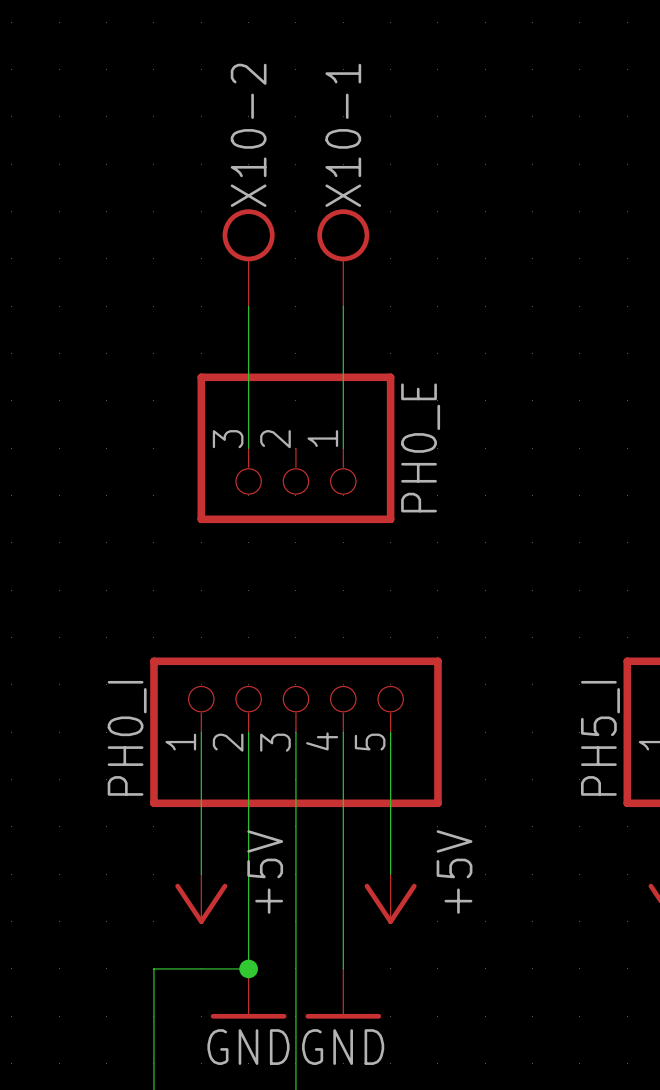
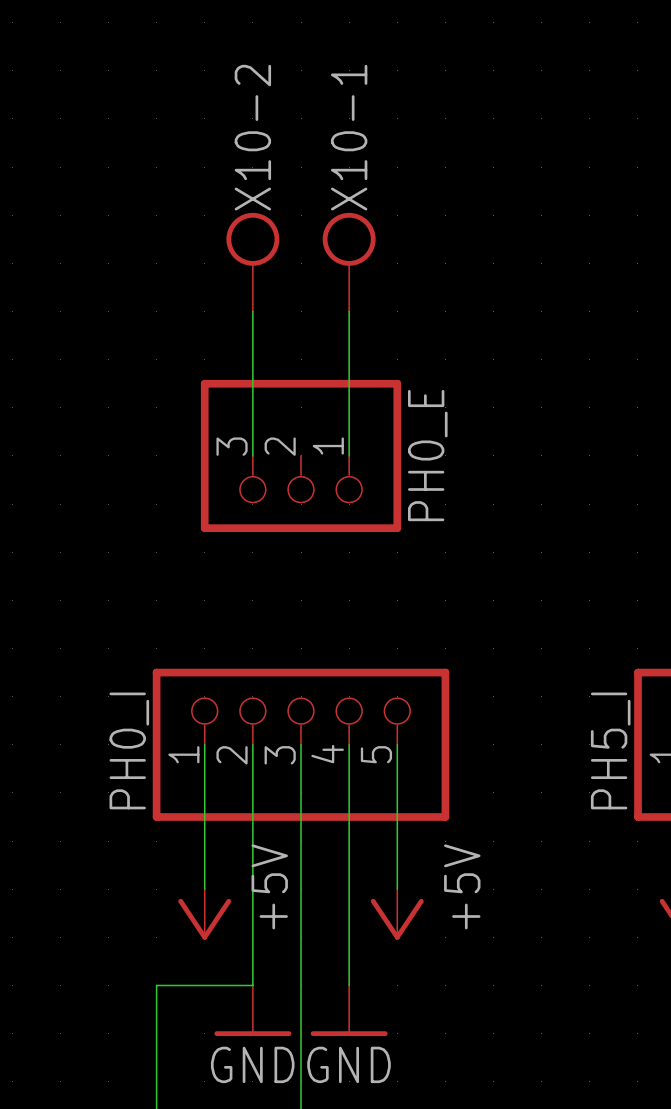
junction: (248, 968) -> none

